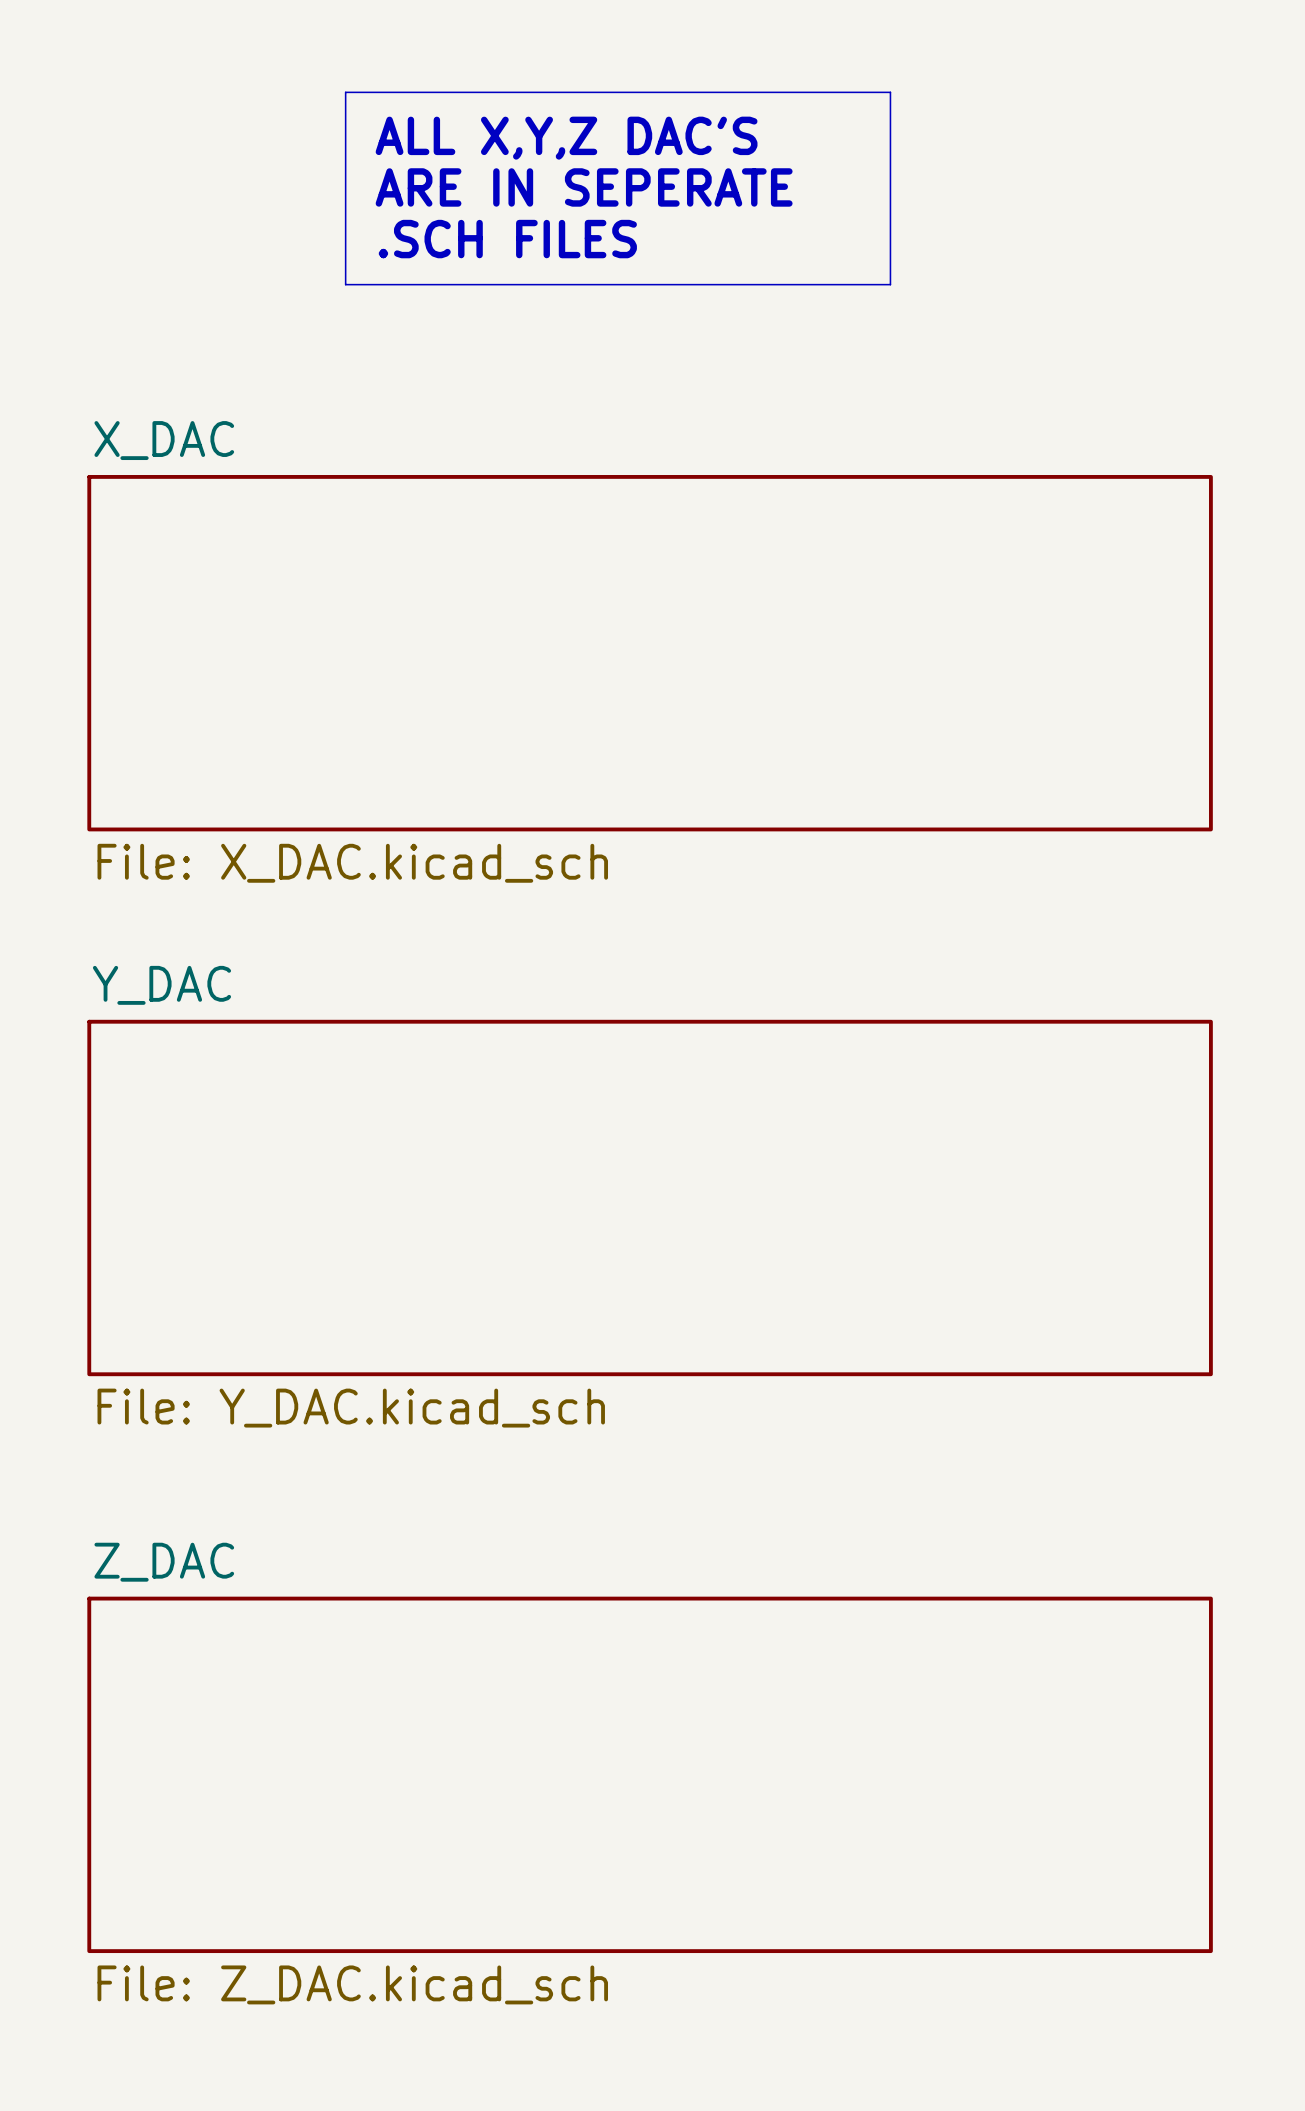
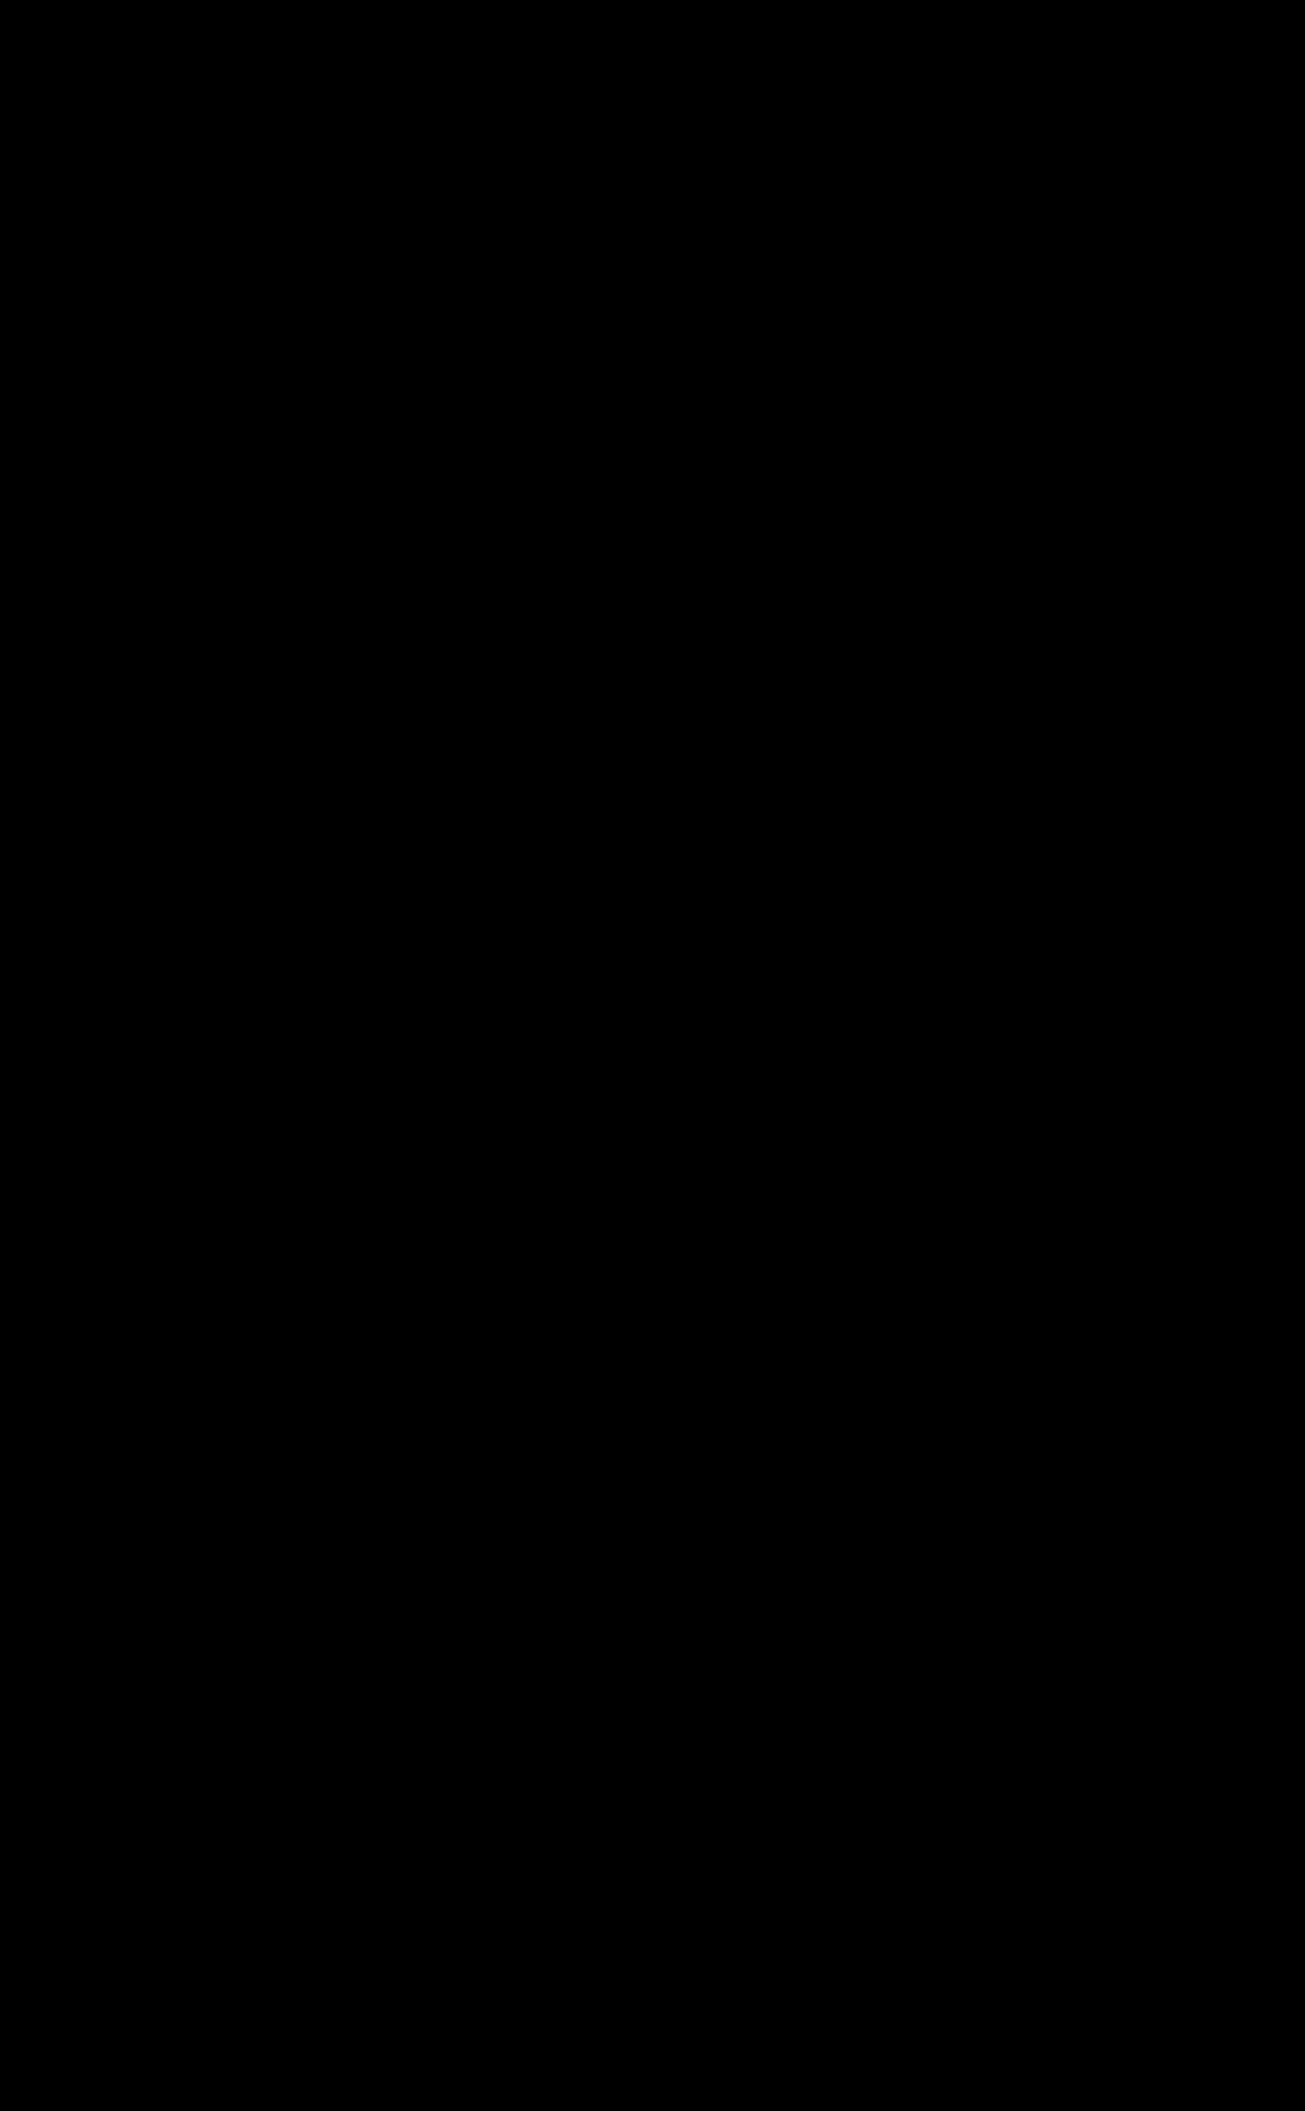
line: (345, 92) (890, 92) (890, 284) (345, 284) (345, 92) -> none
text: ALL X,Y,Z DAC'S (566, 138) -> none
text: ARE IN SEPERATE (584, 187) -> none
text: .SCH FILES (507, 239) -> none
sheet X_DAC: File: X_DAC.kicad_sch (650, 653) -> none
sheet Y_DAC: File: Y_DAC.kicad_sch (650, 1197) -> none
sheet Z_DAC: File: Z_DAC.kicad_sch (650, 1774) -> none

